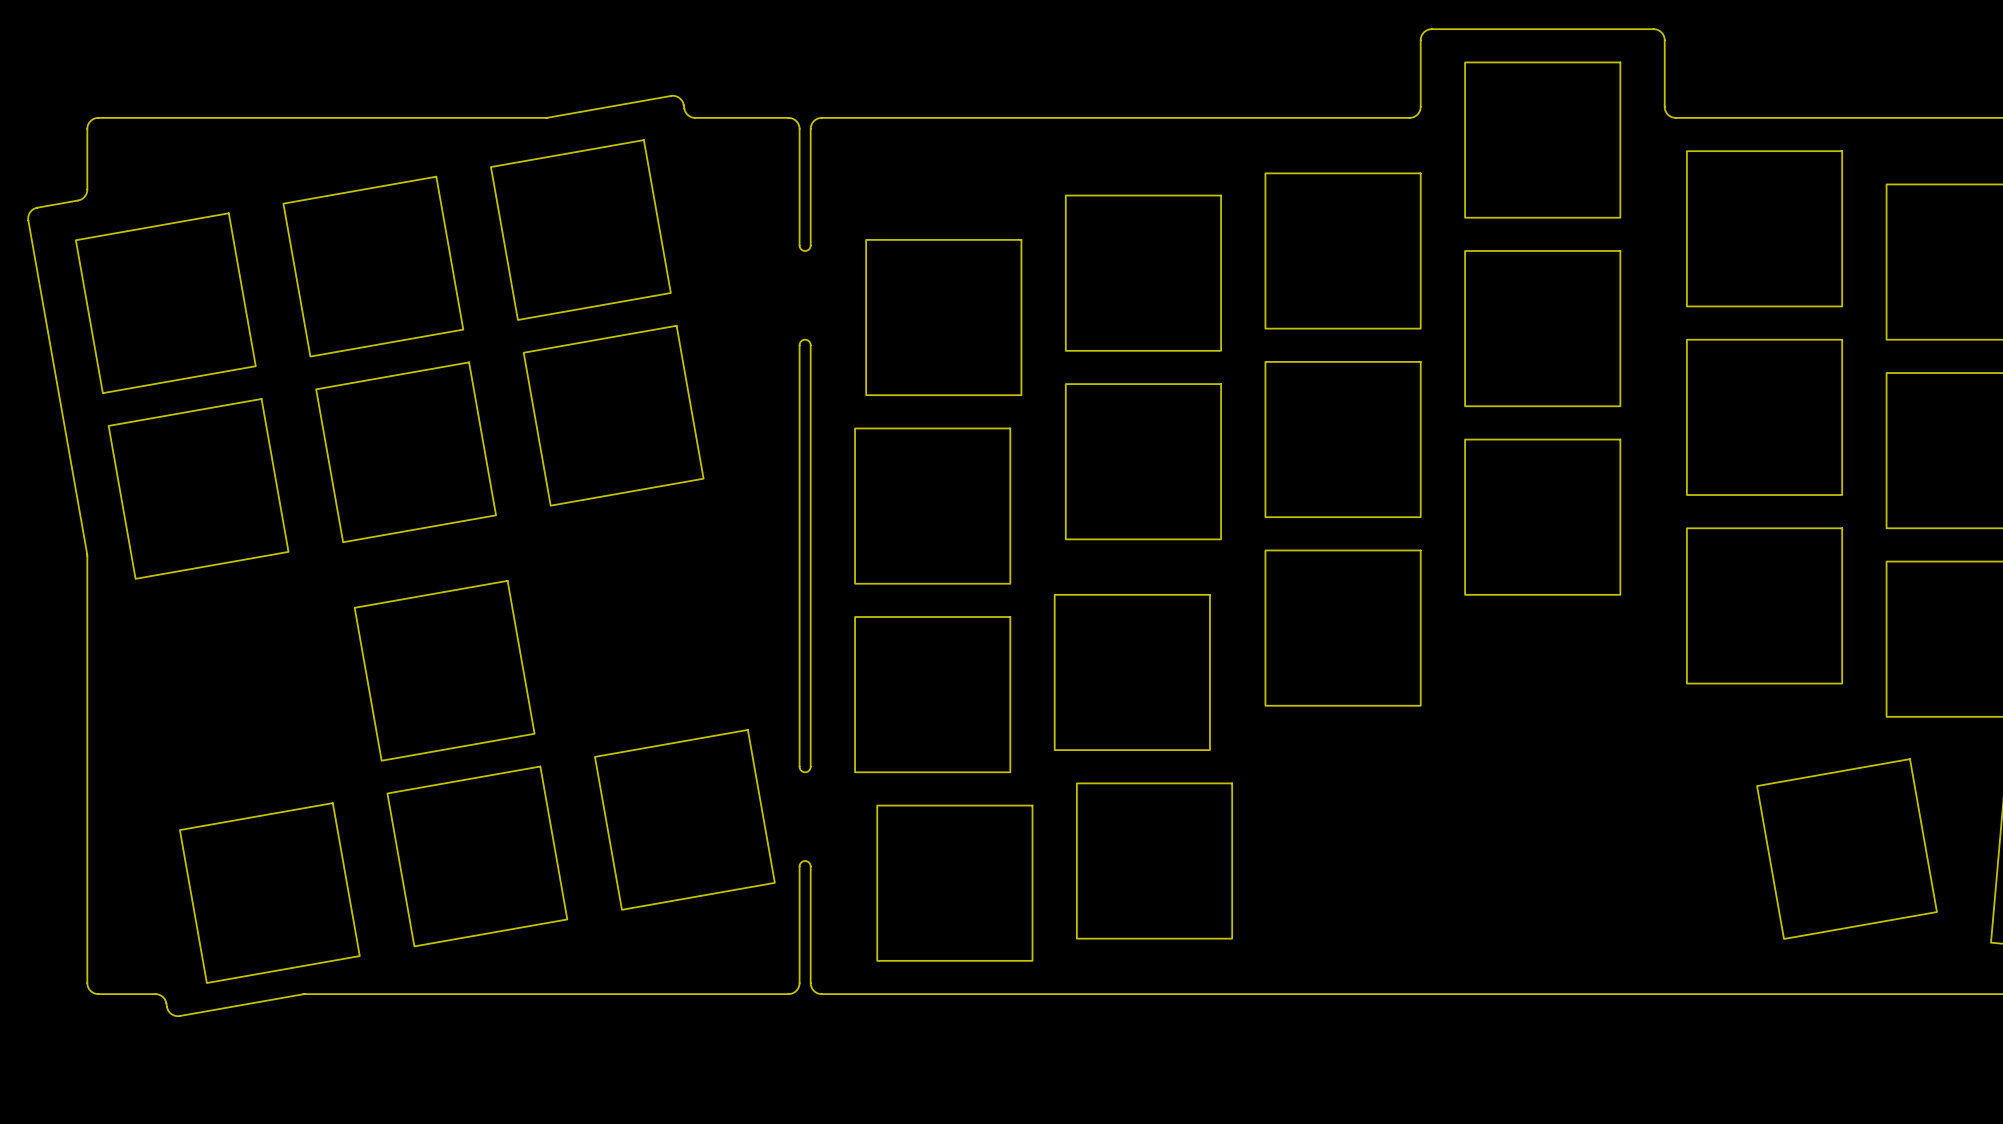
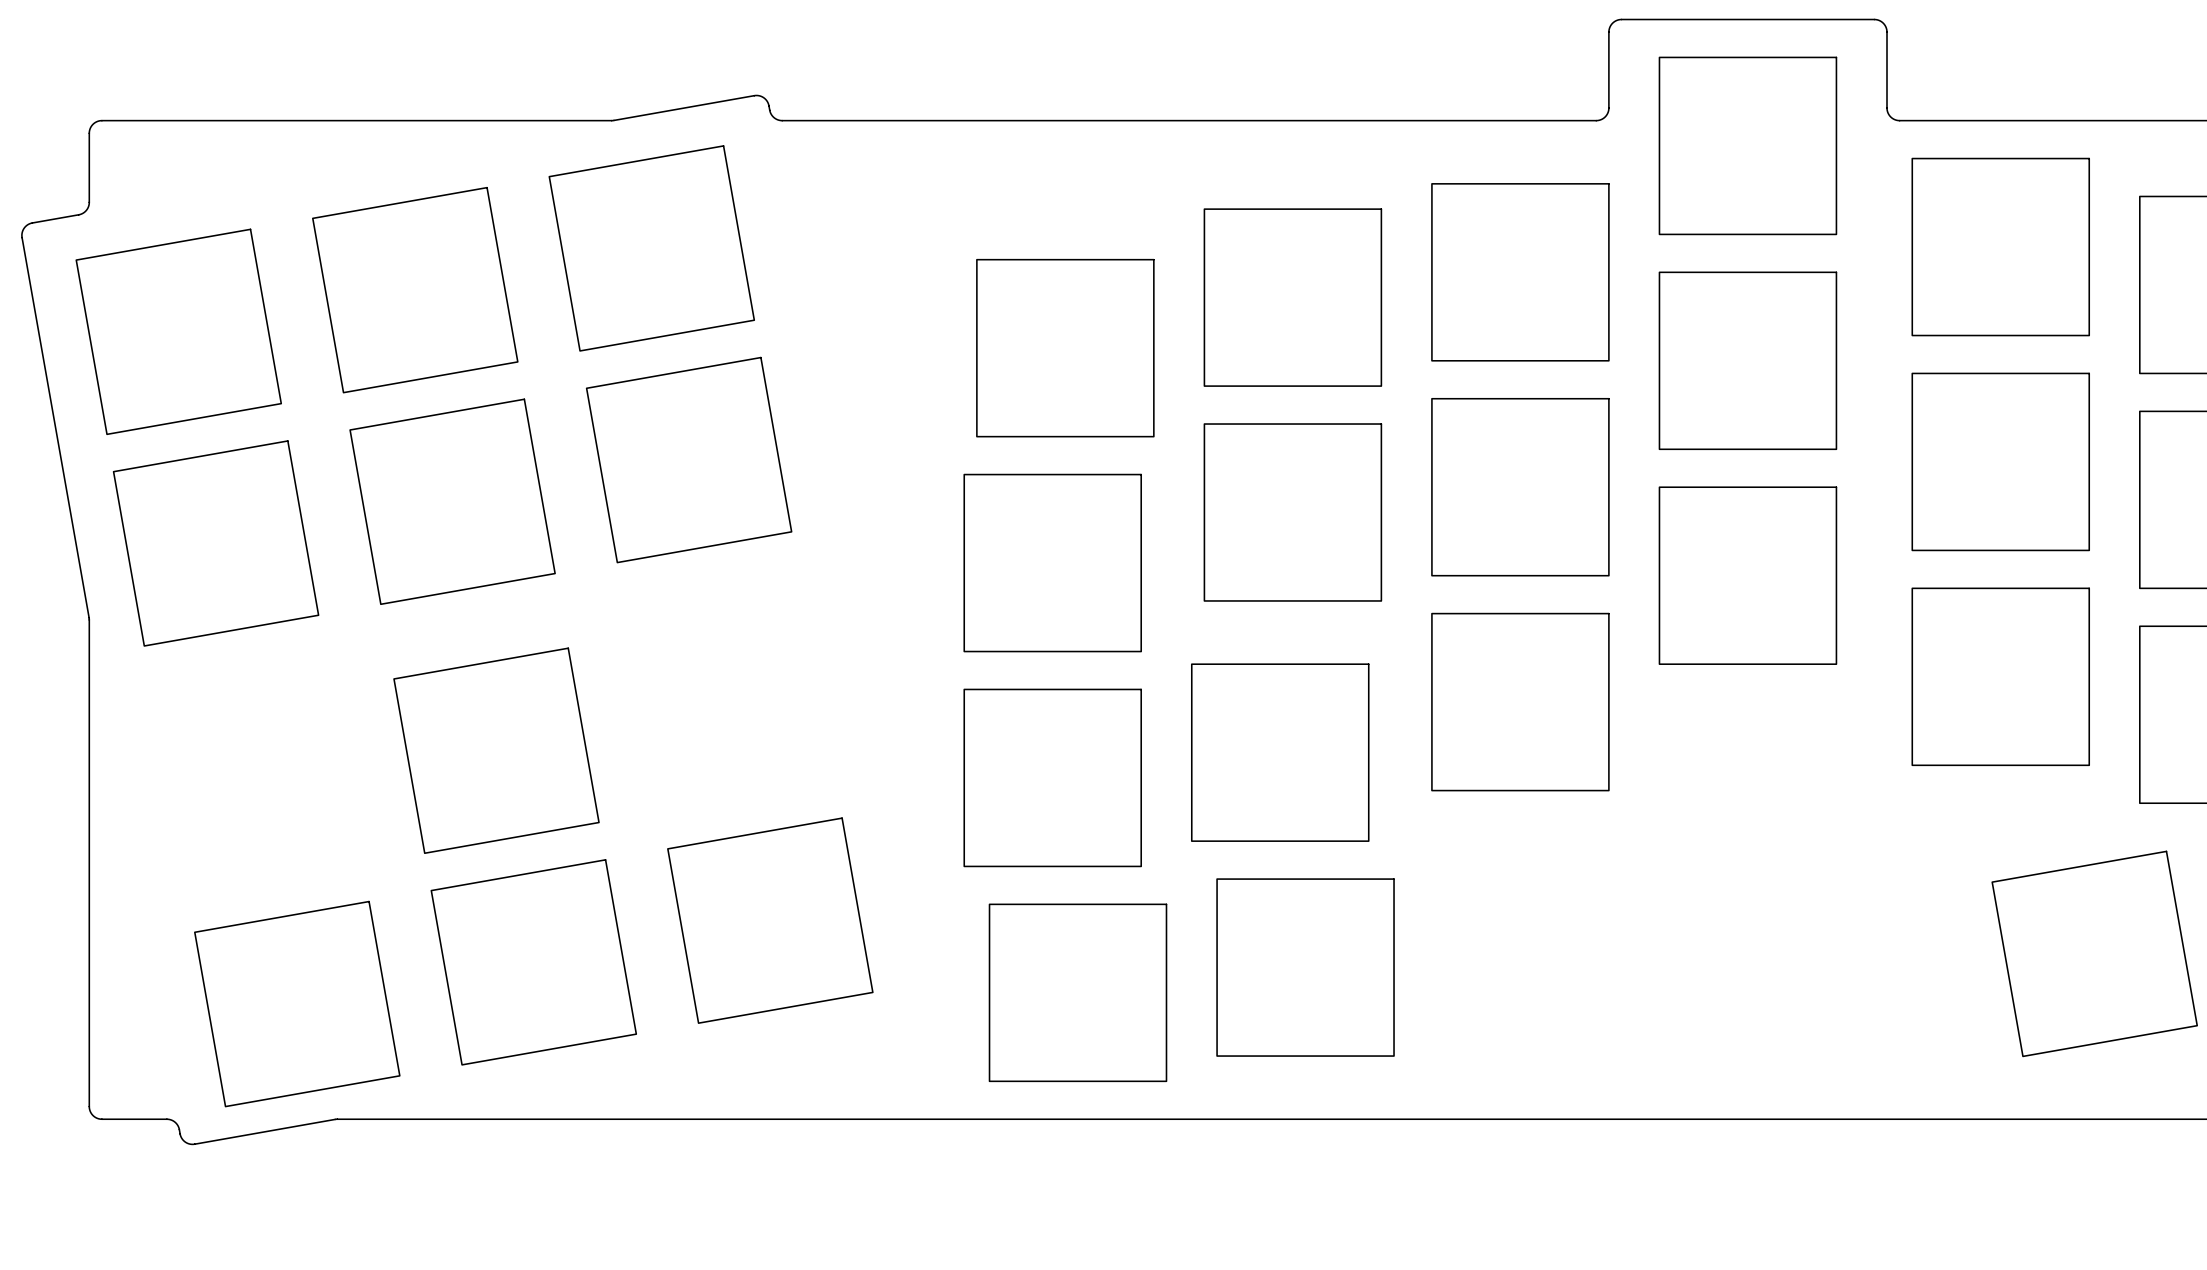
board edge: (821, 117) (814, 120) (810, 127) (810, 245) (809, 249) (805, 250) (801, 249) (799, 245) (799, 127) (796, 121) (788, 117) -> (926, 120) (888, 120)
board edge: (810, 345) (810, 766) (809, 770) (805, 772) (801, 770) (799, 766) (799, 345) (801, 341) (805, 339) (809, 341) (810, 345) -> none
board edge: (821, 994) (814, 991) (810, 984) (810, 866) (809, 862) (805, 861) (801, 862) (799, 866) (799, 984) (796, 990) (788, 994) -> (926, 1119) (888, 1119)

